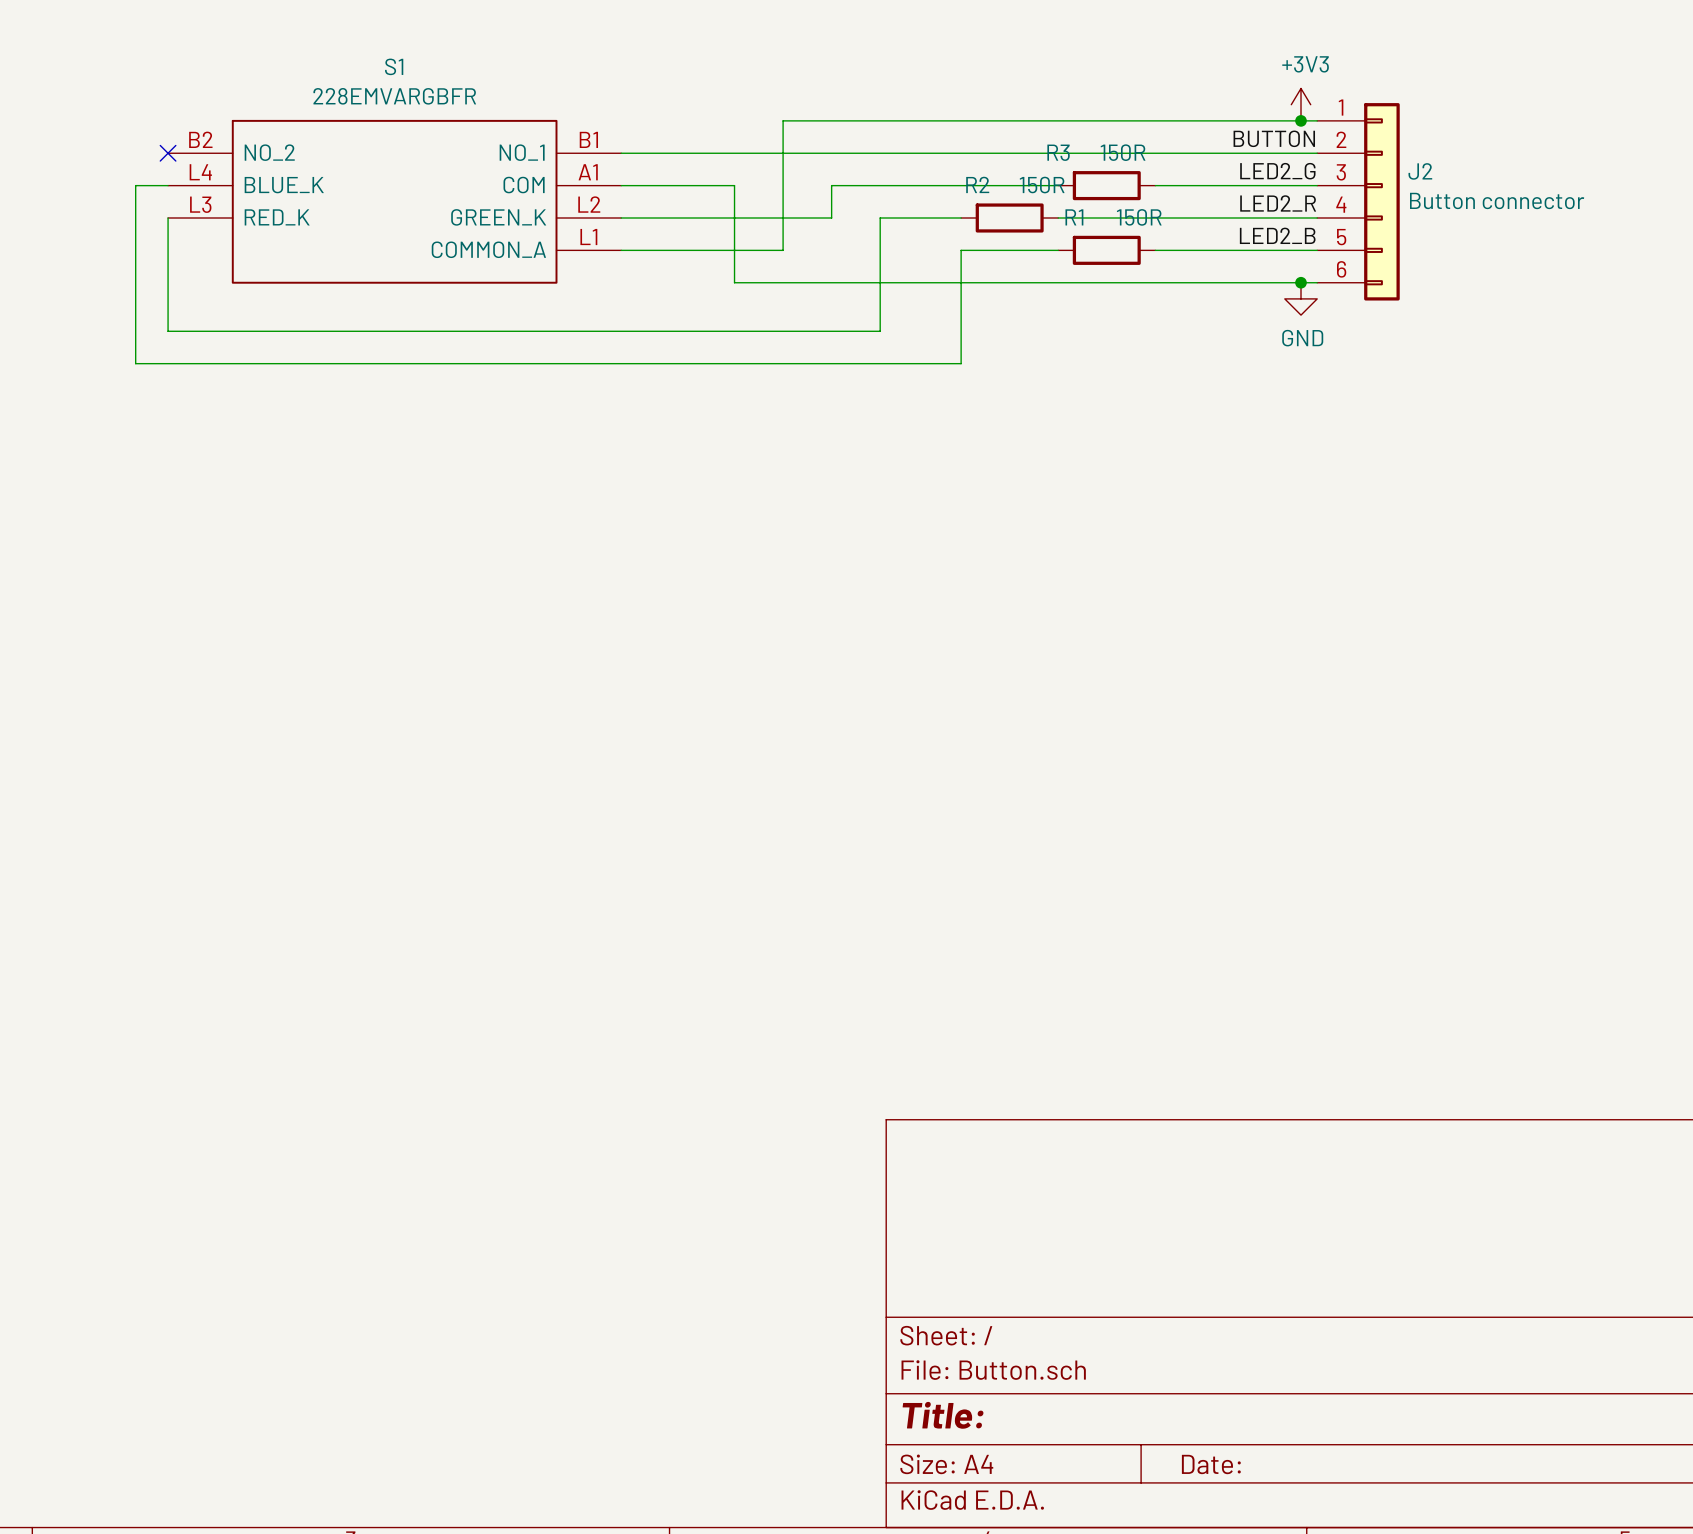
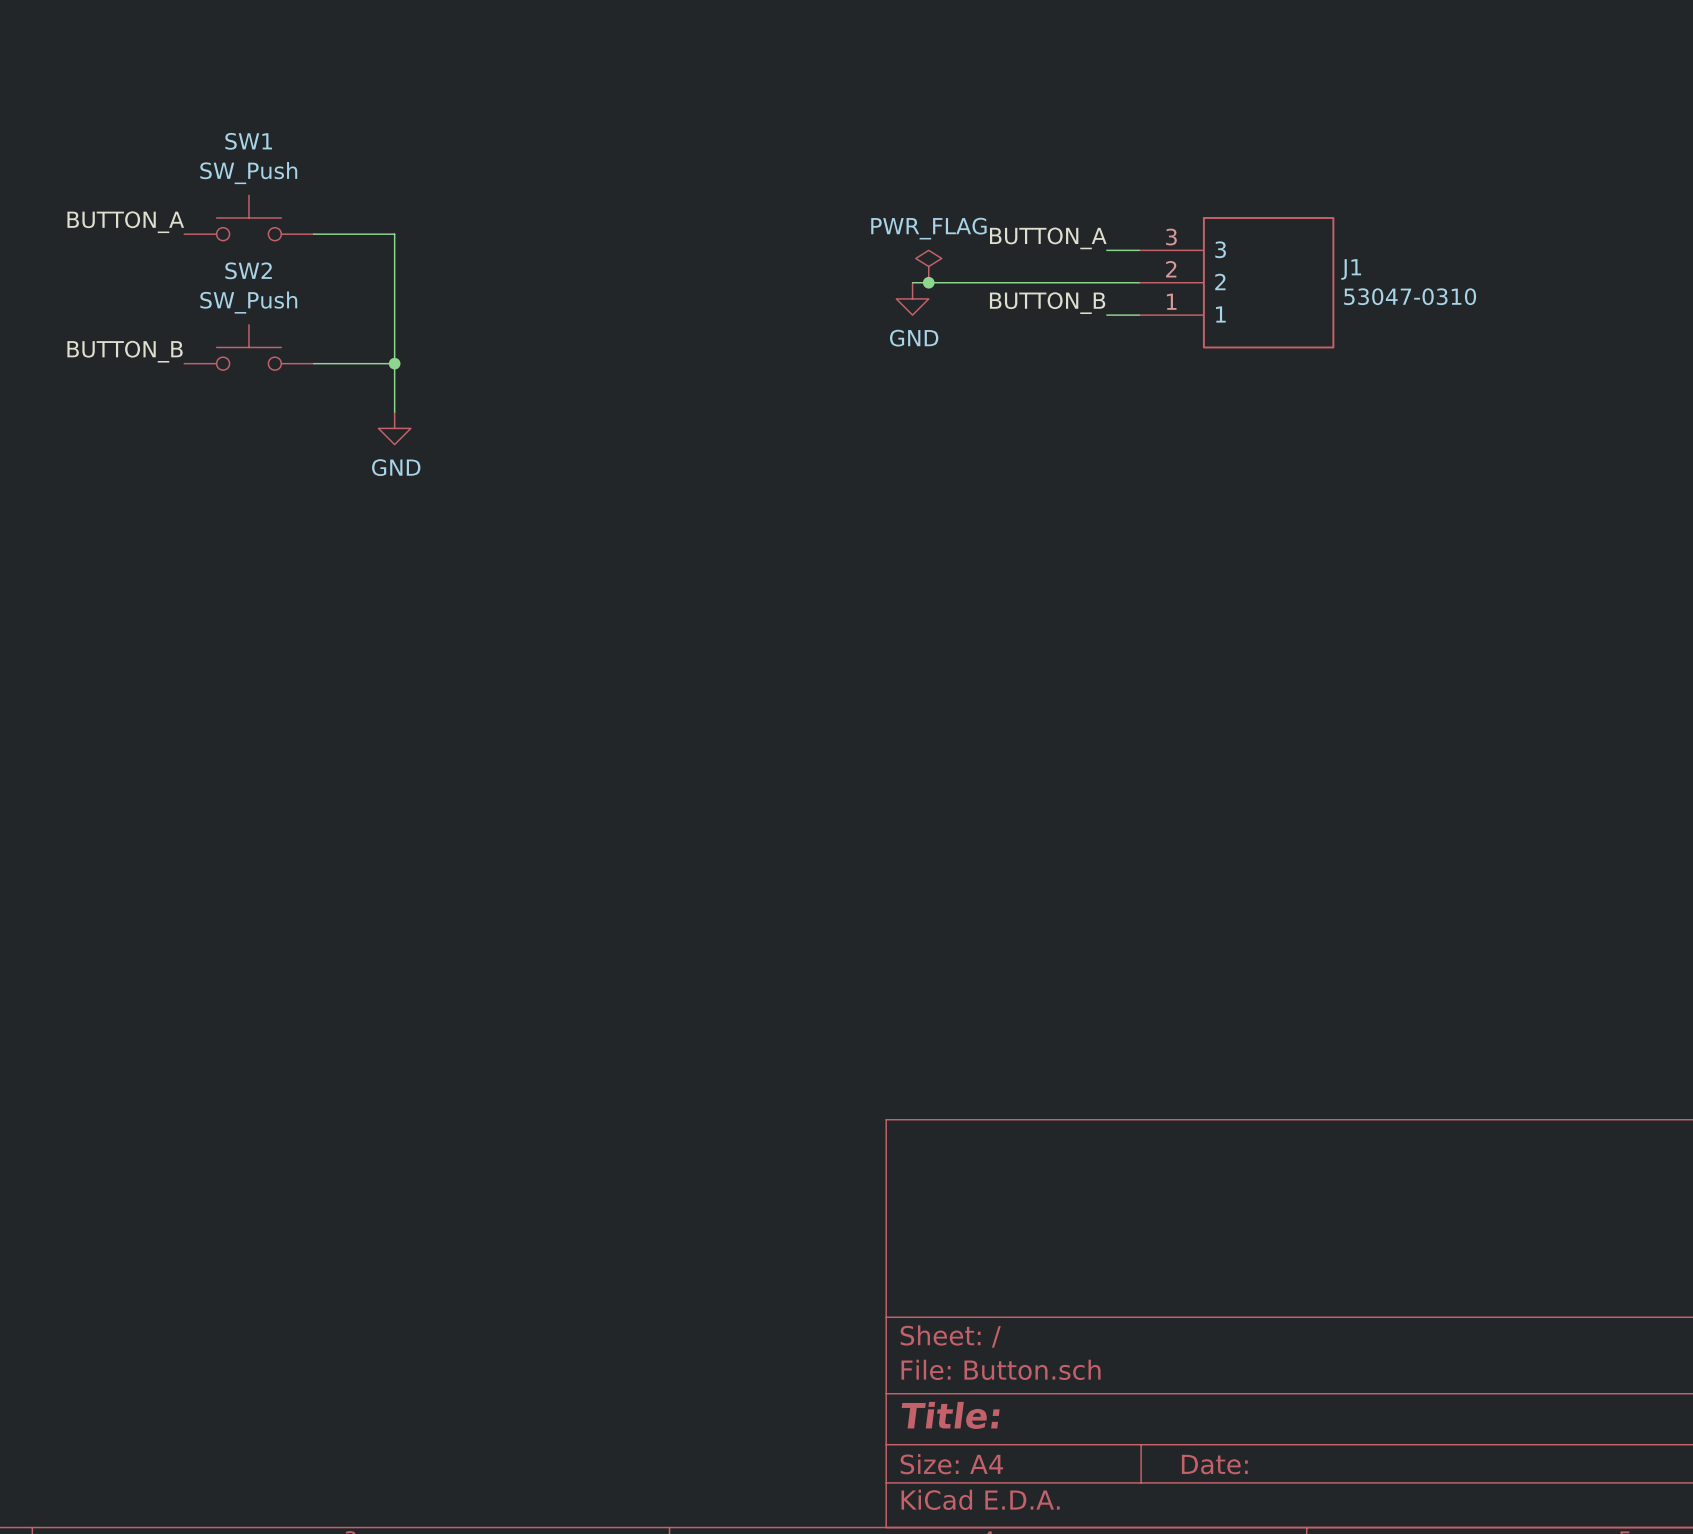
power symbol: +3V3 (1301, 104) -> none
junction: (1301, 120) -> none
wire: (1317, 120) (783, 120) (783, 250) (621, 250) -> none
label: BUTTON (1274, 138) -> none
no-connect mark: (168, 153) -> none
wire: (621, 153) (1317, 153) -> none
label: LED2_G (1277, 171) -> none
wire: (168, 185) (135, 185) (135, 363) (313, 363) -> none
wire: (621, 185) (734, 185) (734, 282) (912, 282) -> none
wire: (1058, 185) (831, 185) (831, 218) (621, 218) -> none
R3: 150R (1106, 185) -> none
wire: (1155, 185) (1317, 185) -> none
S1: 228EMVARGBFR (394, 201) -> none
J2: Button connector (1358, 201) -> none
label: LED2_R (1278, 203) -> none
wire: (168, 218) (168, 331) (880, 331) (880, 218) (961, 218) -> none
SW1: none -> SW_Push (248, 218)
R2: 150R (1009, 218) -> none
wire: (1058, 218) (1317, 218) -> none
label: none -> BUTTON_A (125, 222)
wire: none -> (313, 234) (394, 234) (394, 412)
label: none -> BUTTON_A (1048, 238)
label: LED2_B (1277, 235) -> none
wire: (1058, 250) (961, 250) (961, 363) (394, 363) -> none
wire: none -> (1106, 250) (1139, 250)
R1: 150R (1106, 250) -> none
wire: (1155, 250) (1317, 250) -> none
power symbol: none -> PWR_FLAG (928, 266)
junction: none -> (928, 282)
wire: (1139, 282) (1317, 282) -> none
J1: none -> 53047-0310 (1236, 282)
junction: (1301, 282) -> none
power symbol: none -> GND (912, 298)
power symbol: GND (1301, 298) -> none
label: none -> BUTTON_B (1047, 303)
wire: none -> (1106, 315) (1139, 315)
SW2: none -> SW_Push (248, 347)
label: none -> BUTTON_B (125, 351)
junction: none -> (394, 363)
power symbol: none -> GND (394, 428)

